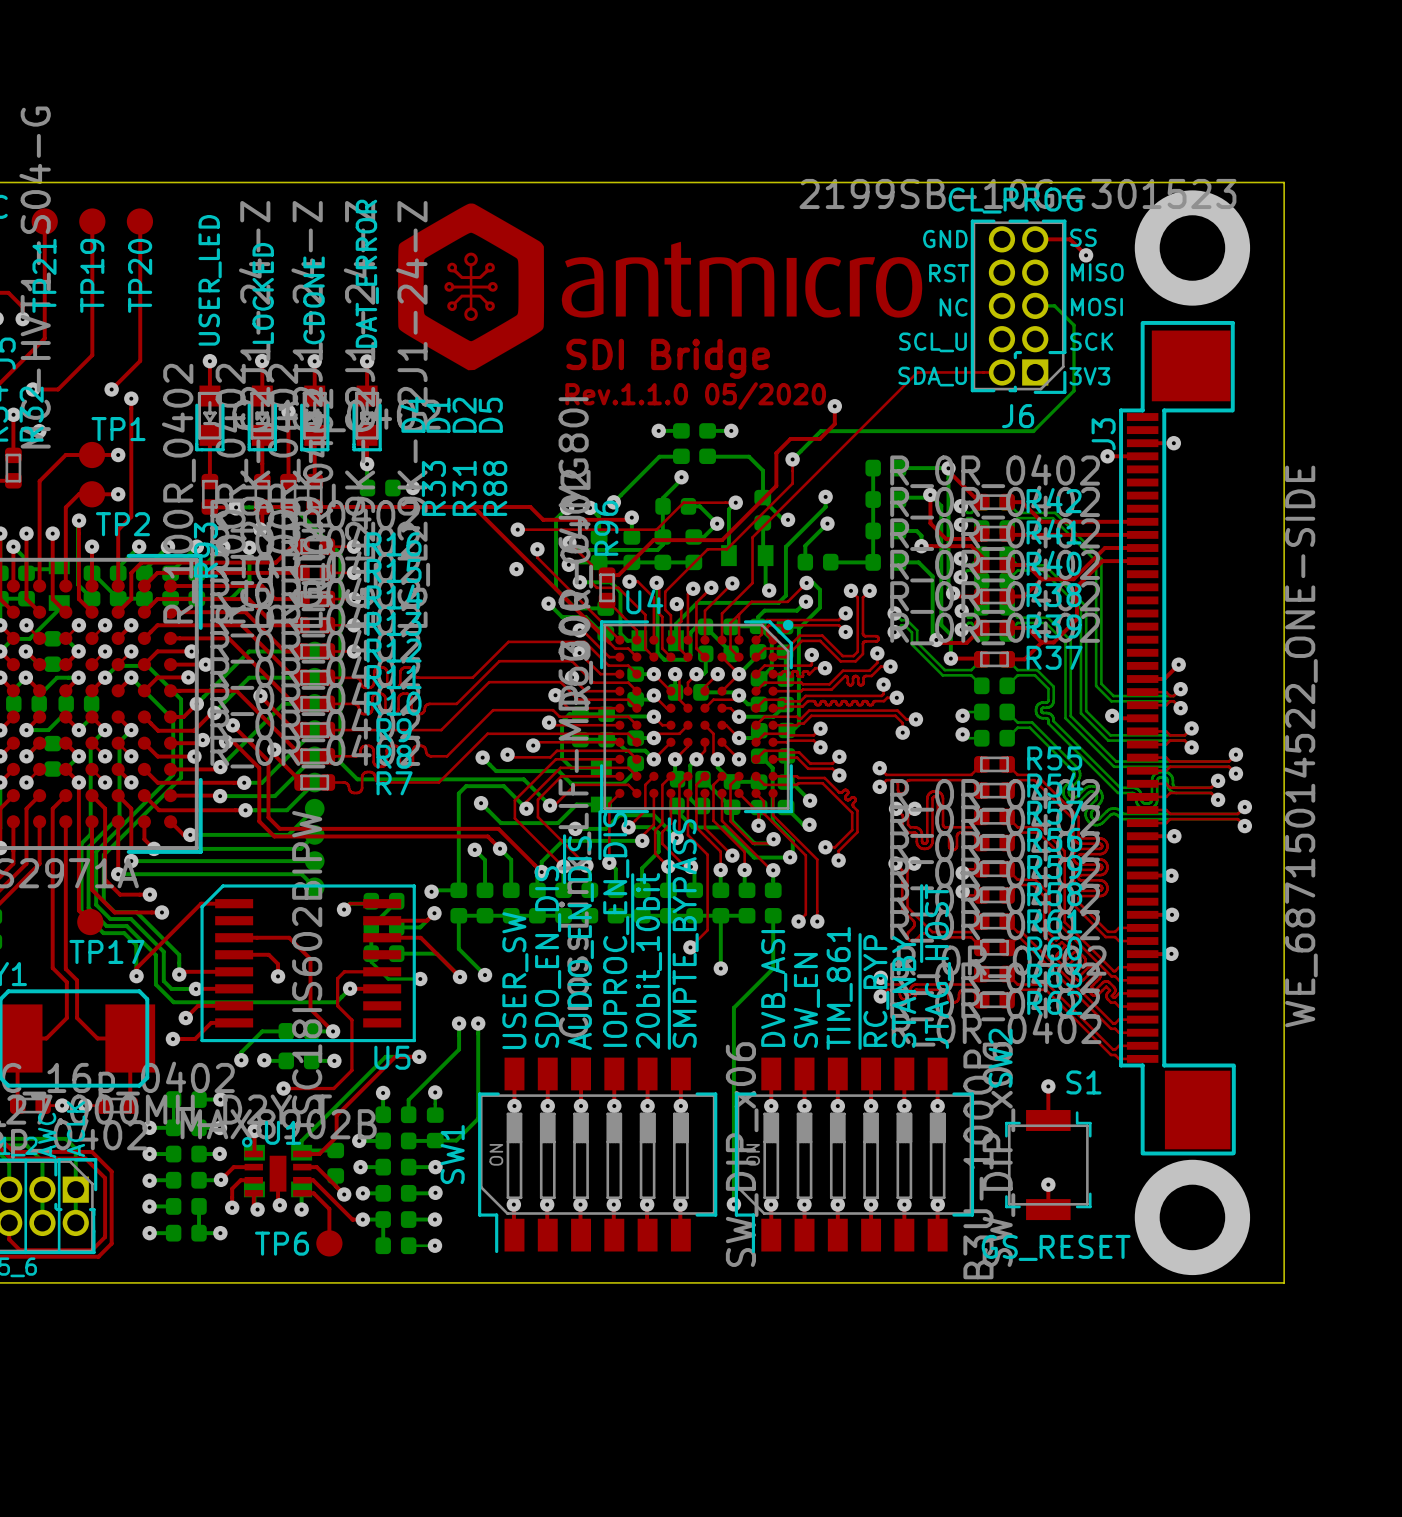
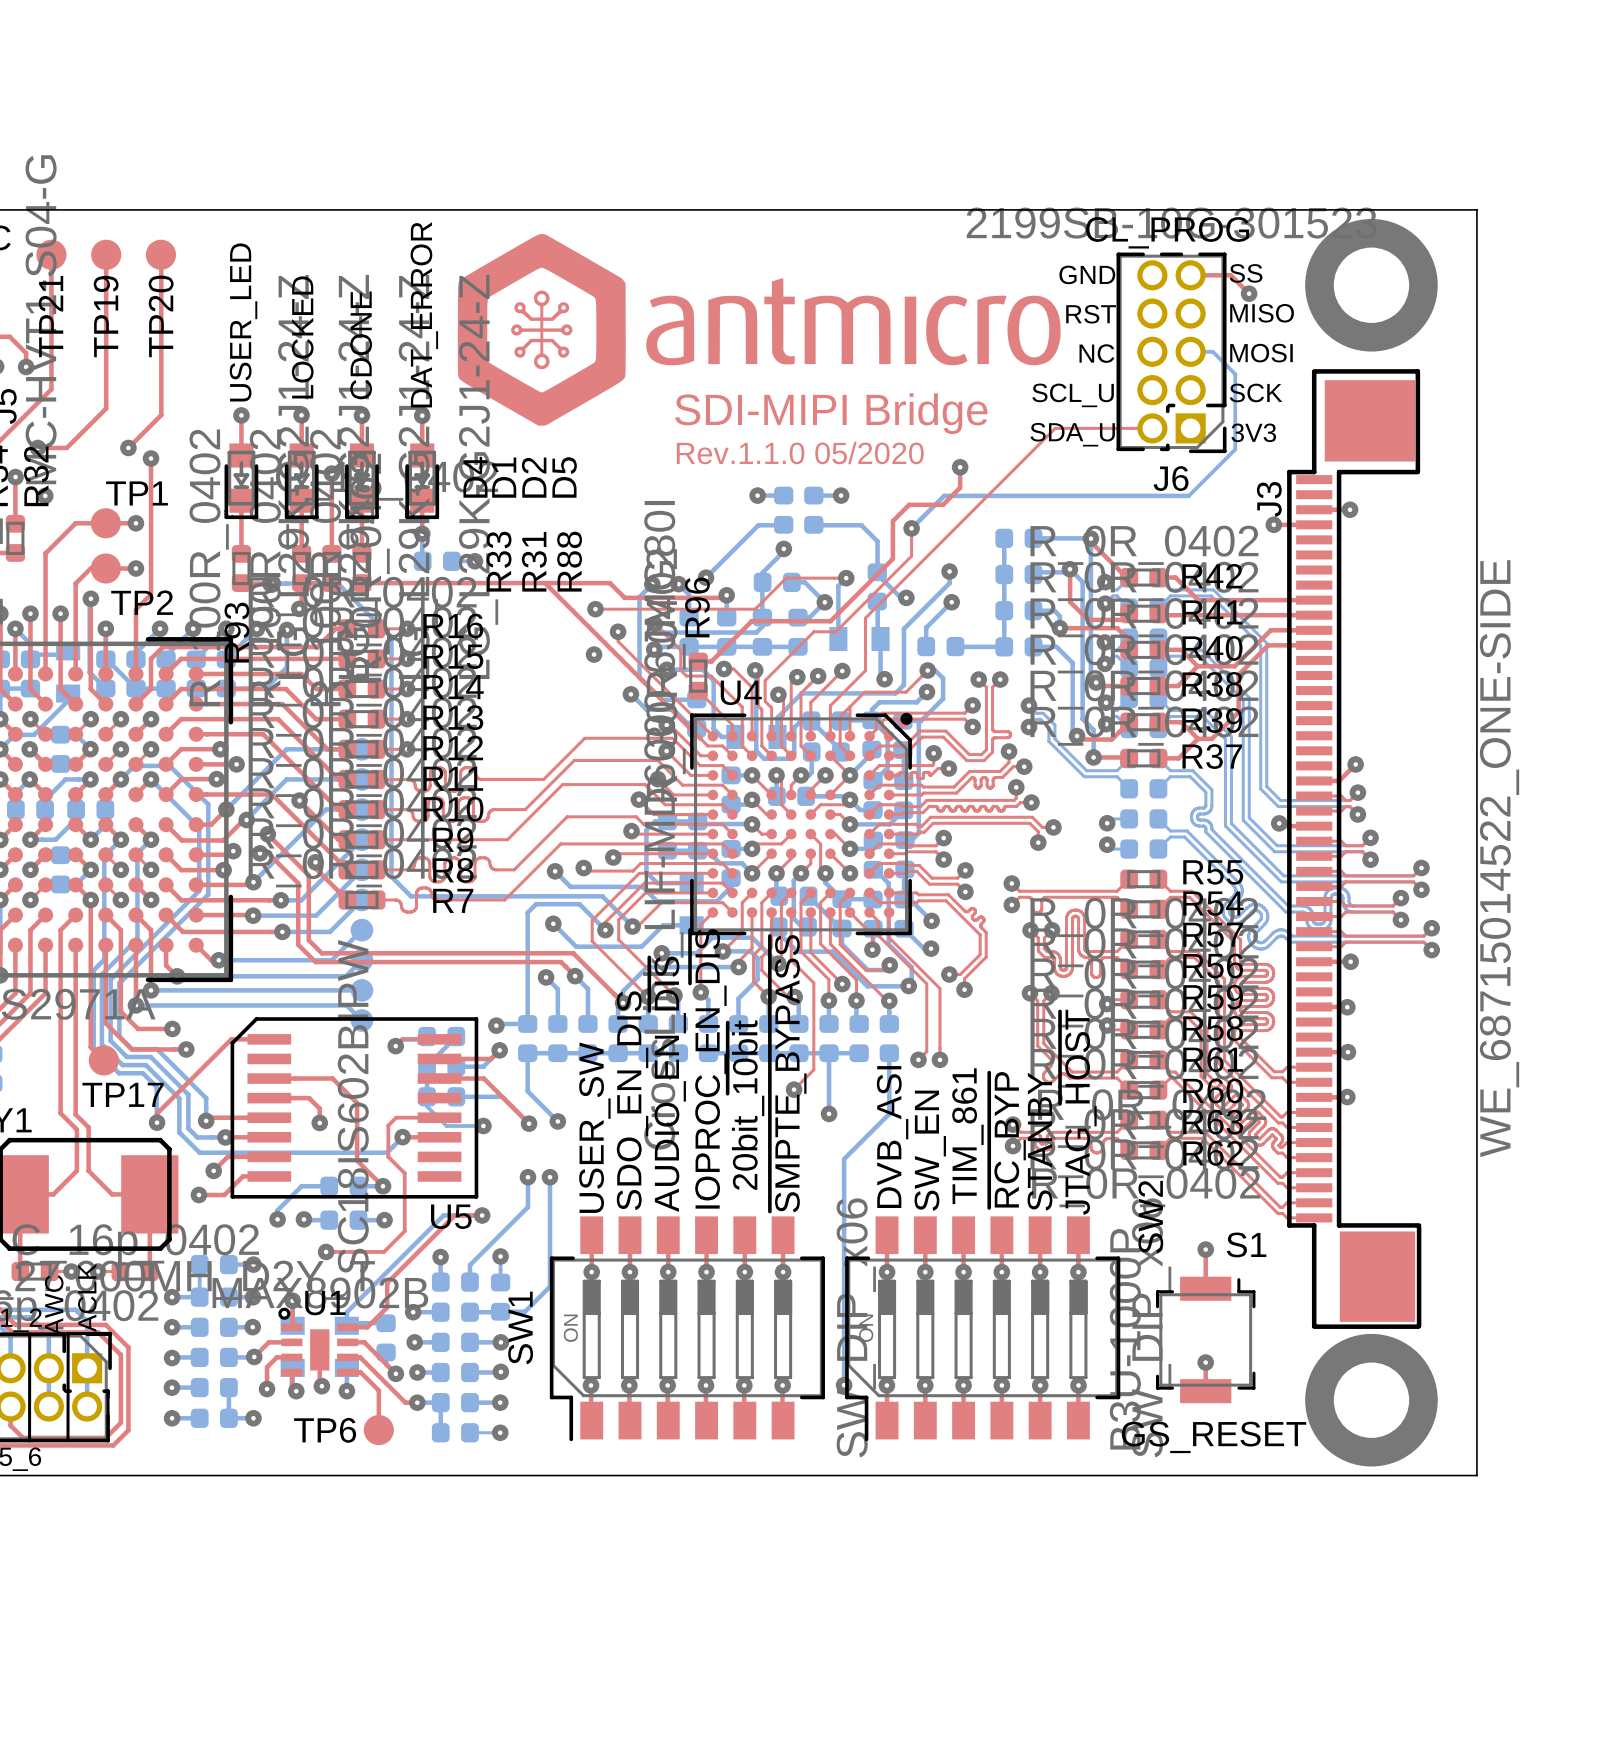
text: SDI Bridge (668, 358) -> SDI-MIPI Bridge (831, 413)

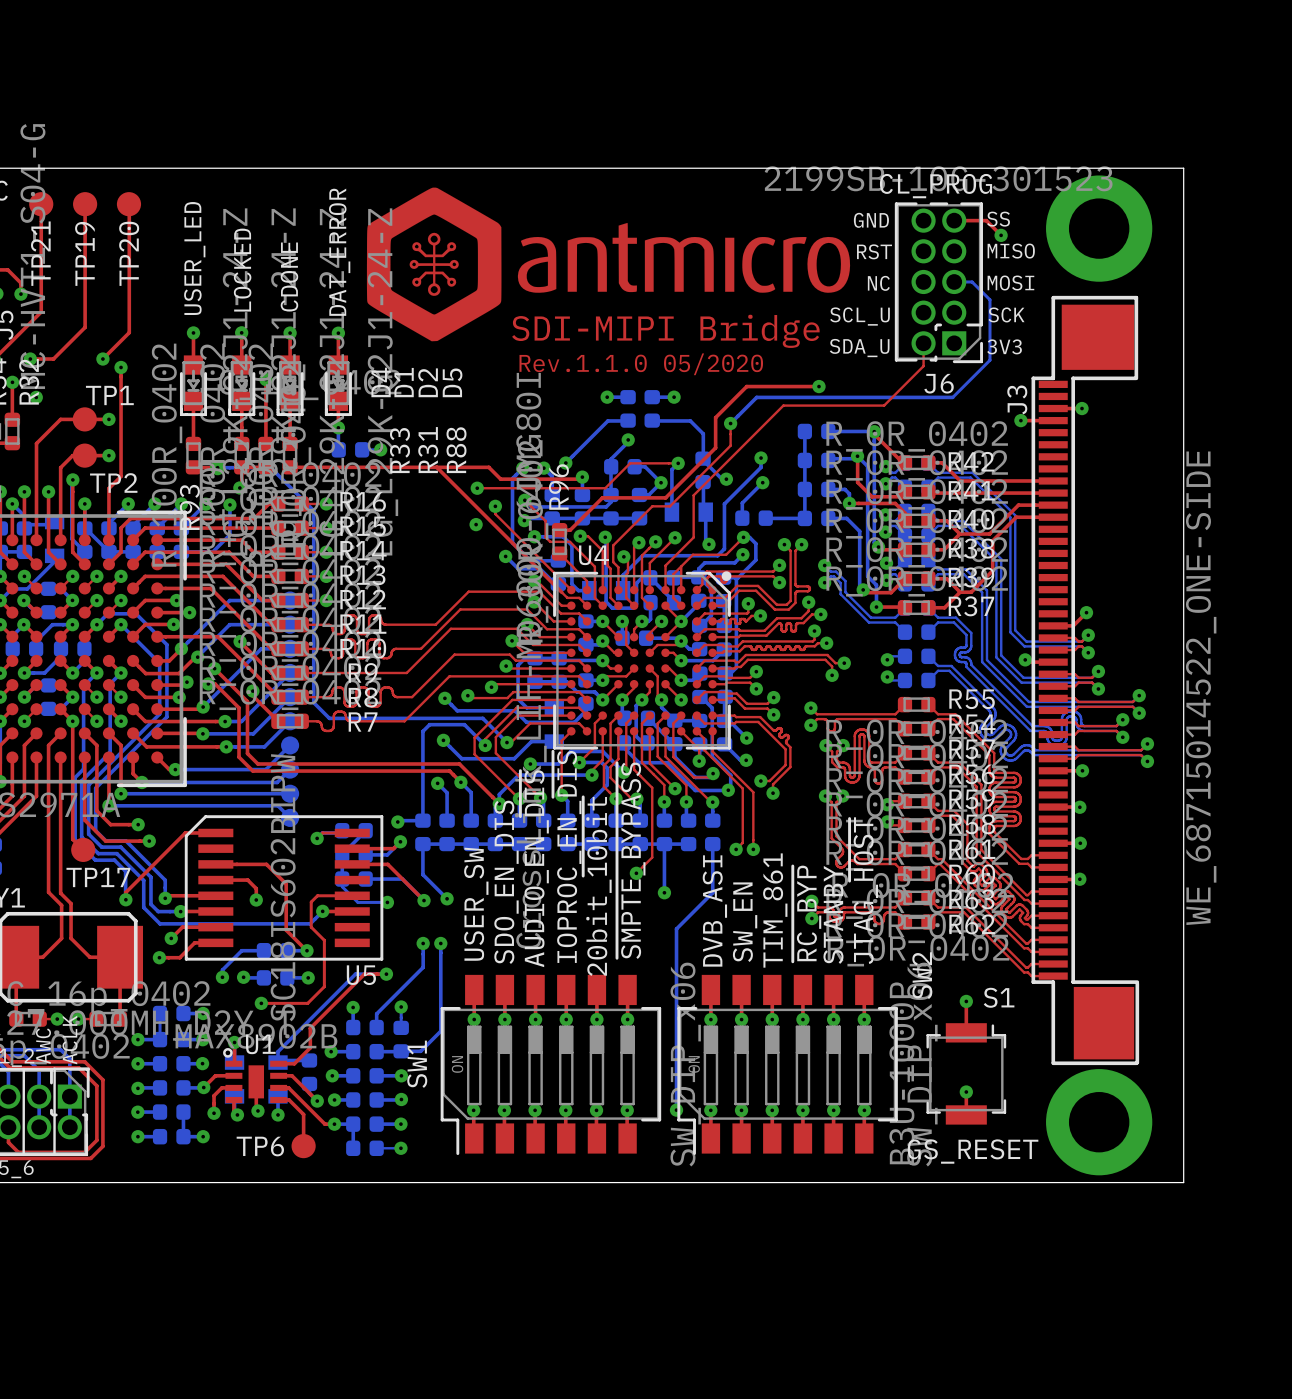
top track: (1152, 428) (1055, 428) (977, 506) -> (923, 343) (923, 366) (884, 405) (783, 405)
top track: (960, 467) (960, 487) (942, 504) (909, 504) -> (819, 386) (746, 386) (728, 404)
via position: (960, 467) -> (819, 386)

